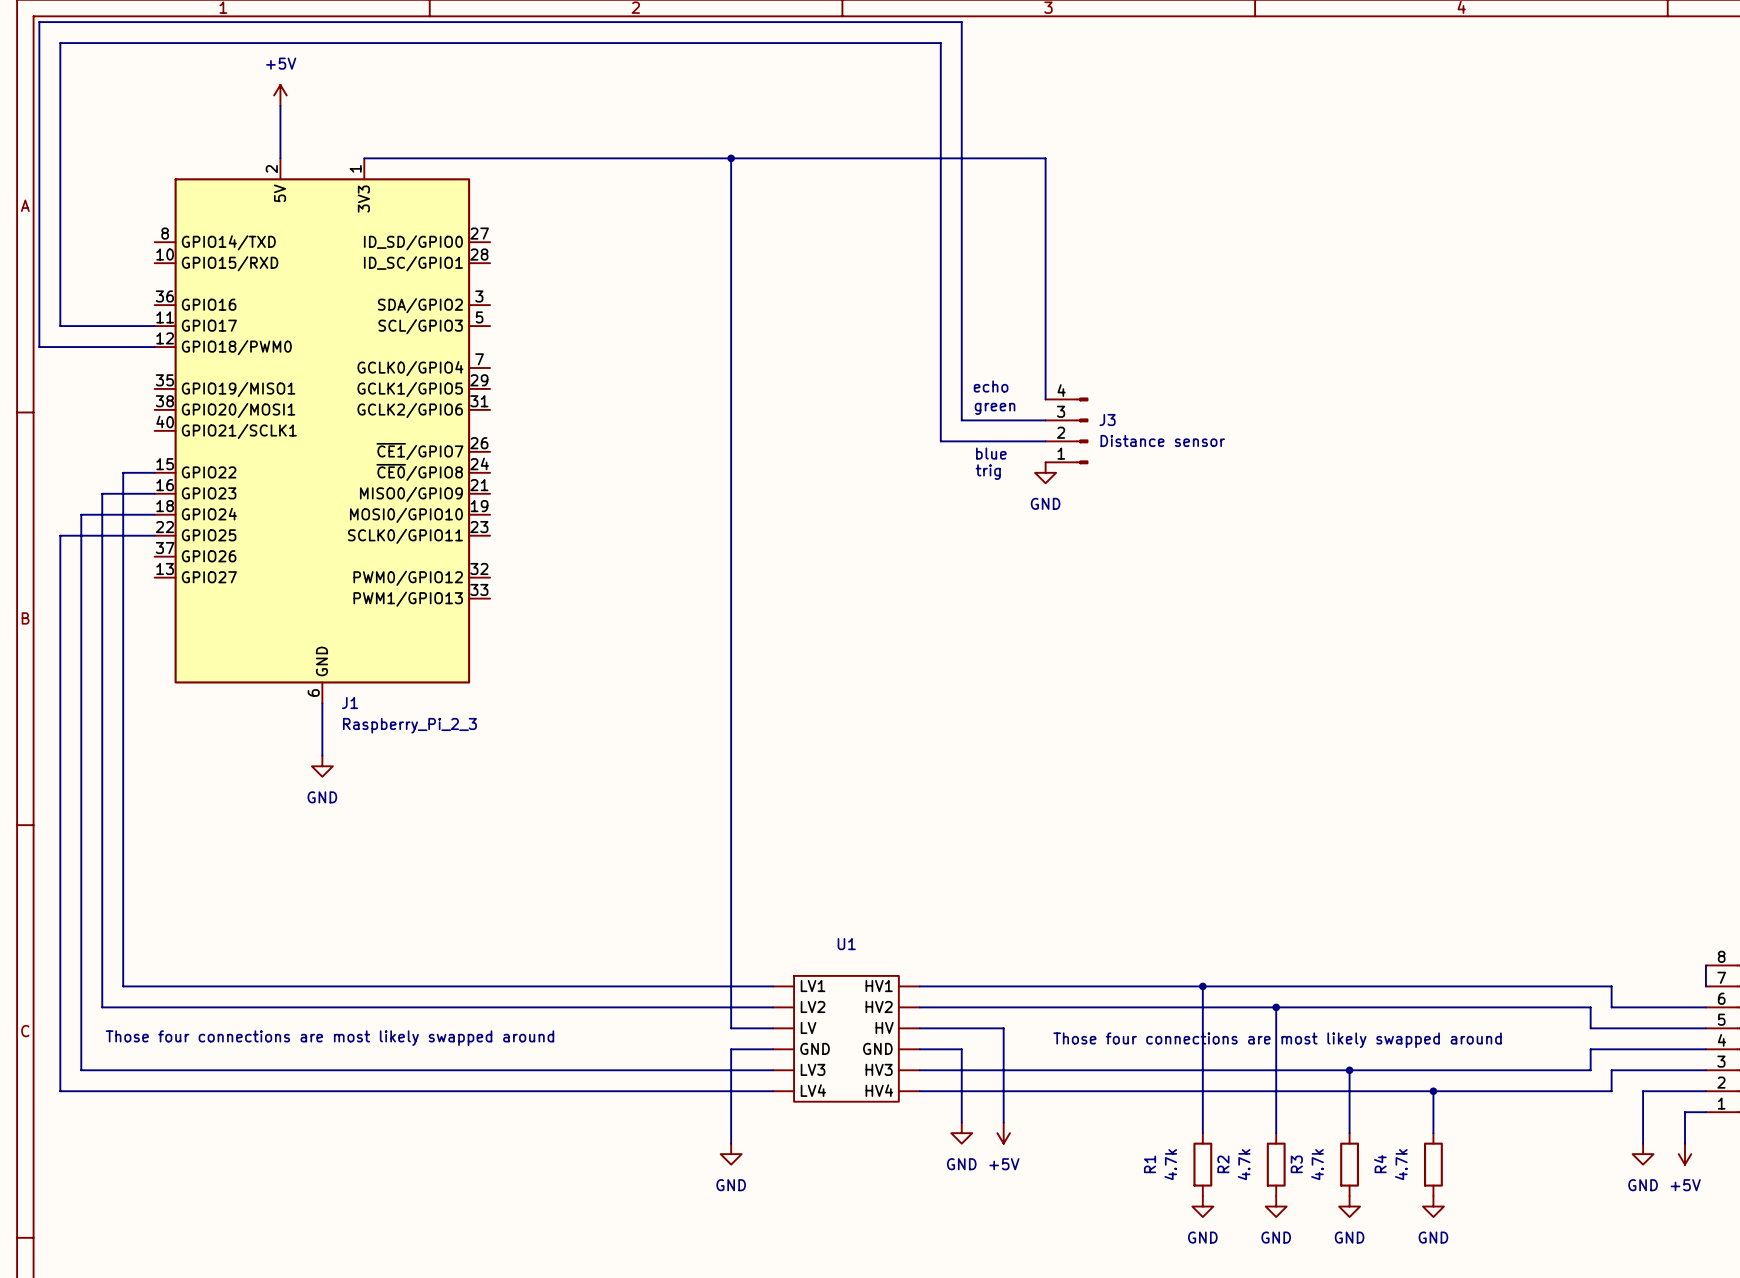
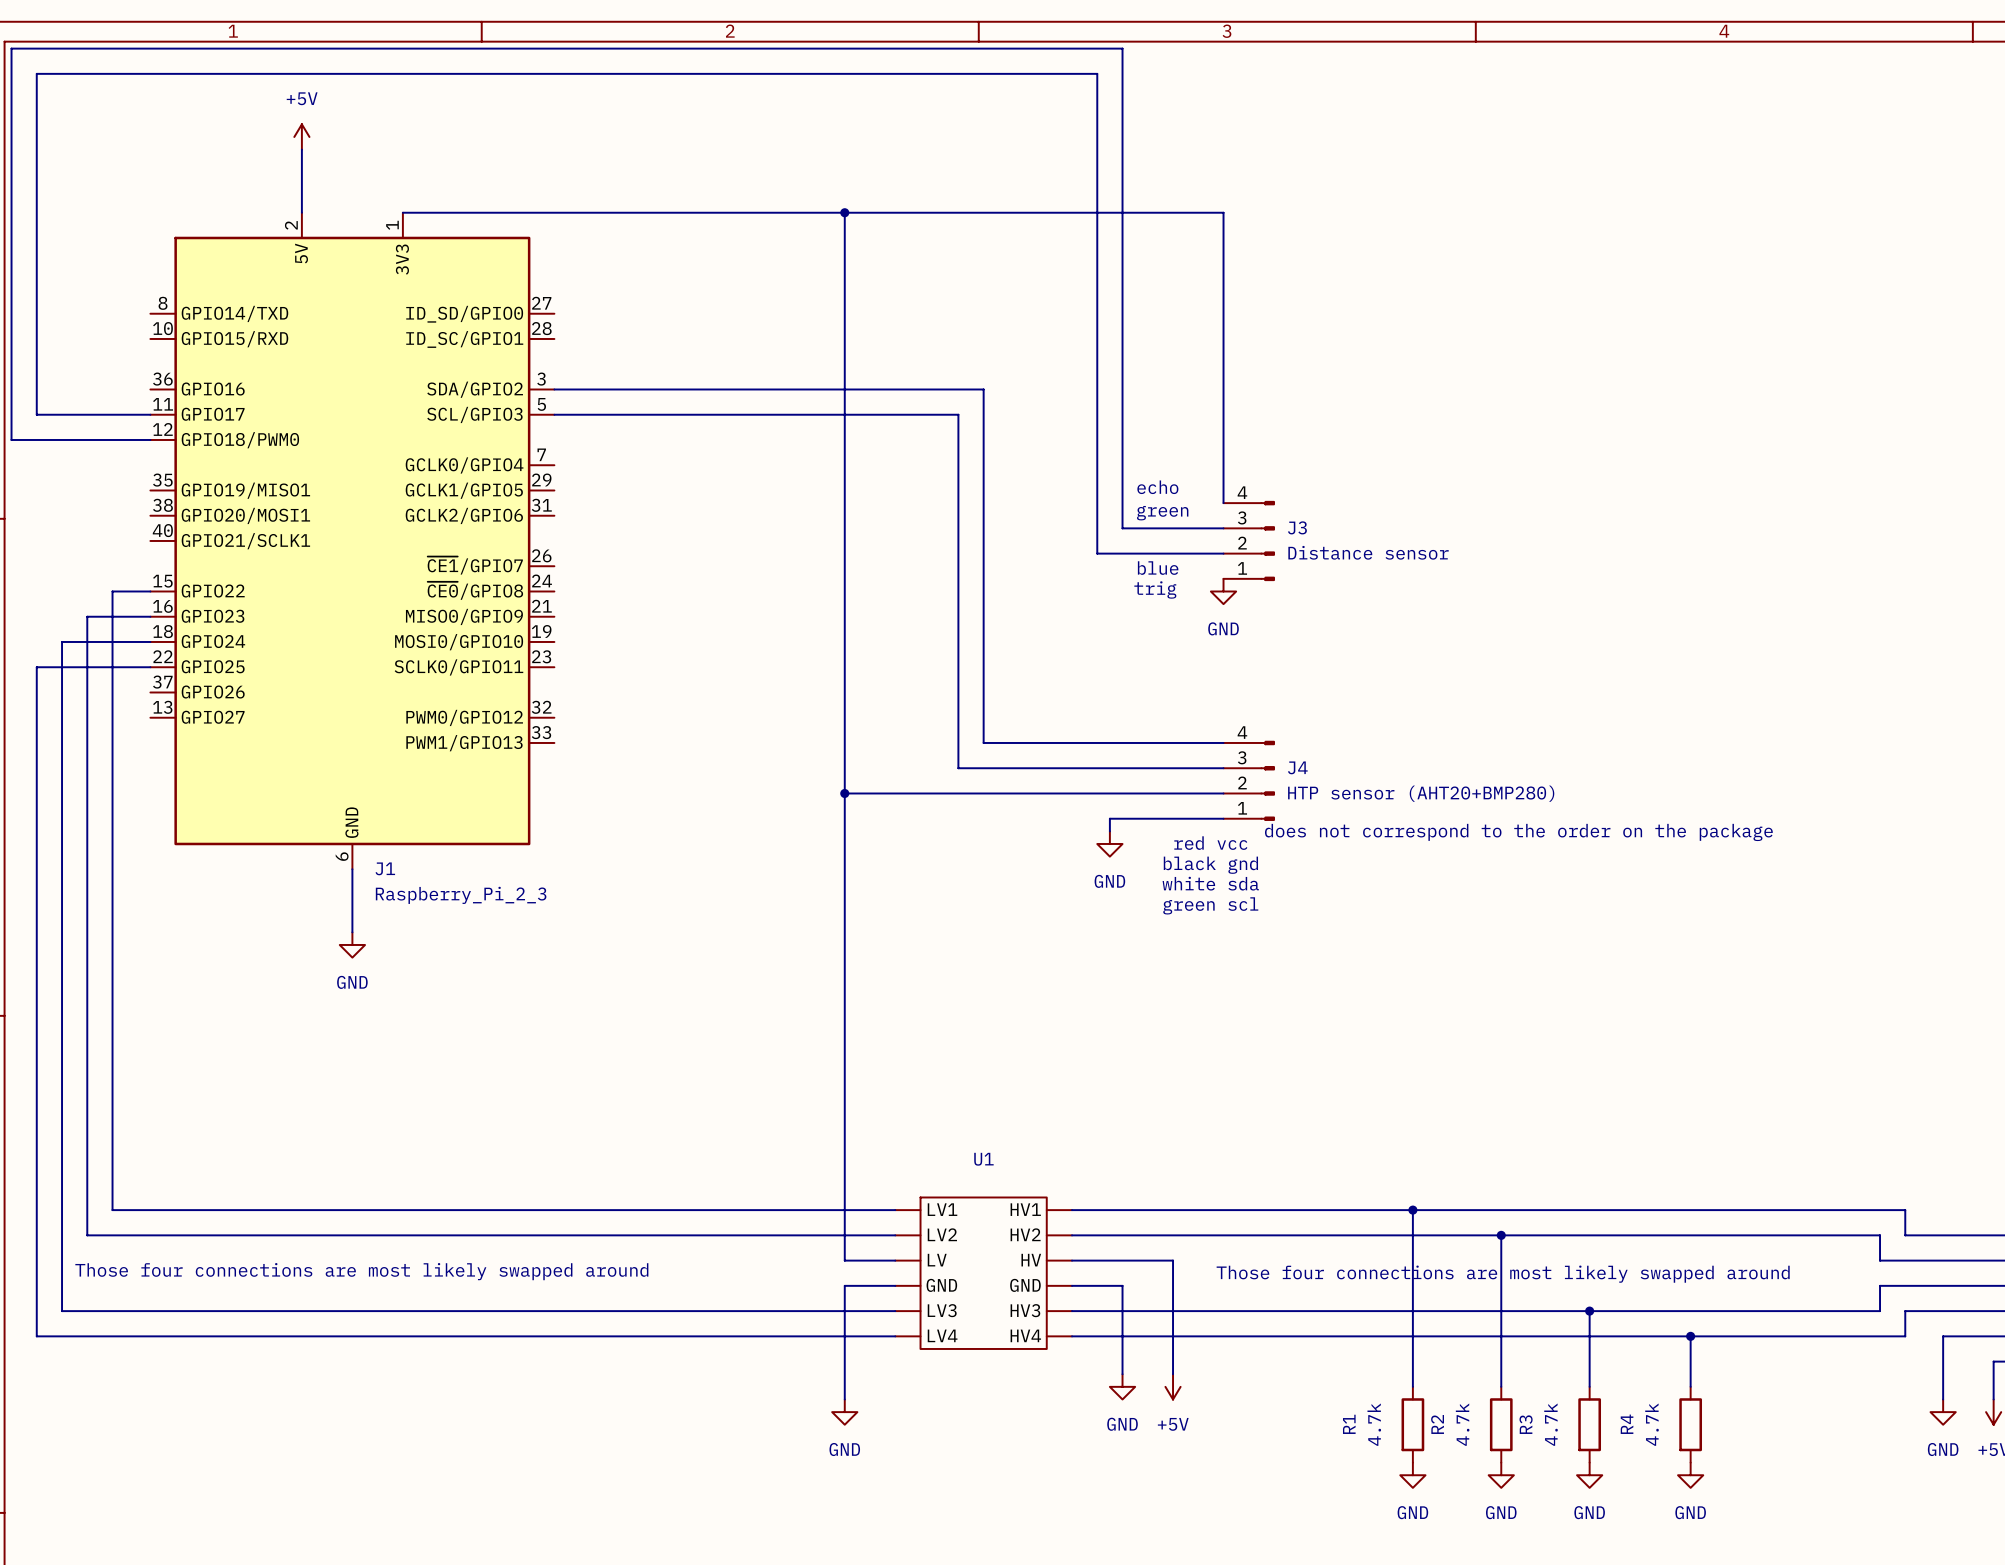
wire: none -> (554, 389) (983, 389) (983, 742) (1223, 742)
wire: none -> (554, 414) (958, 414) (958, 768) (1223, 768)
J4: none -> HTP sensor (AHT20+BMP280) (1249, 780)
wire: none -> (844, 793) (1223, 793)
junction: none -> (844, 793)
wire: none -> (1223, 818) (1109, 818) (1109, 831)
text: none -> does not correspond to the order on the package (1518, 832)
text: none -> red vcc (1210, 843)
power symbol: none -> GND (1109, 843)
text: none -> black gnd (1210, 865)
text: none -> white sda (1210, 883)
text: none -> green scl (1210, 905)

